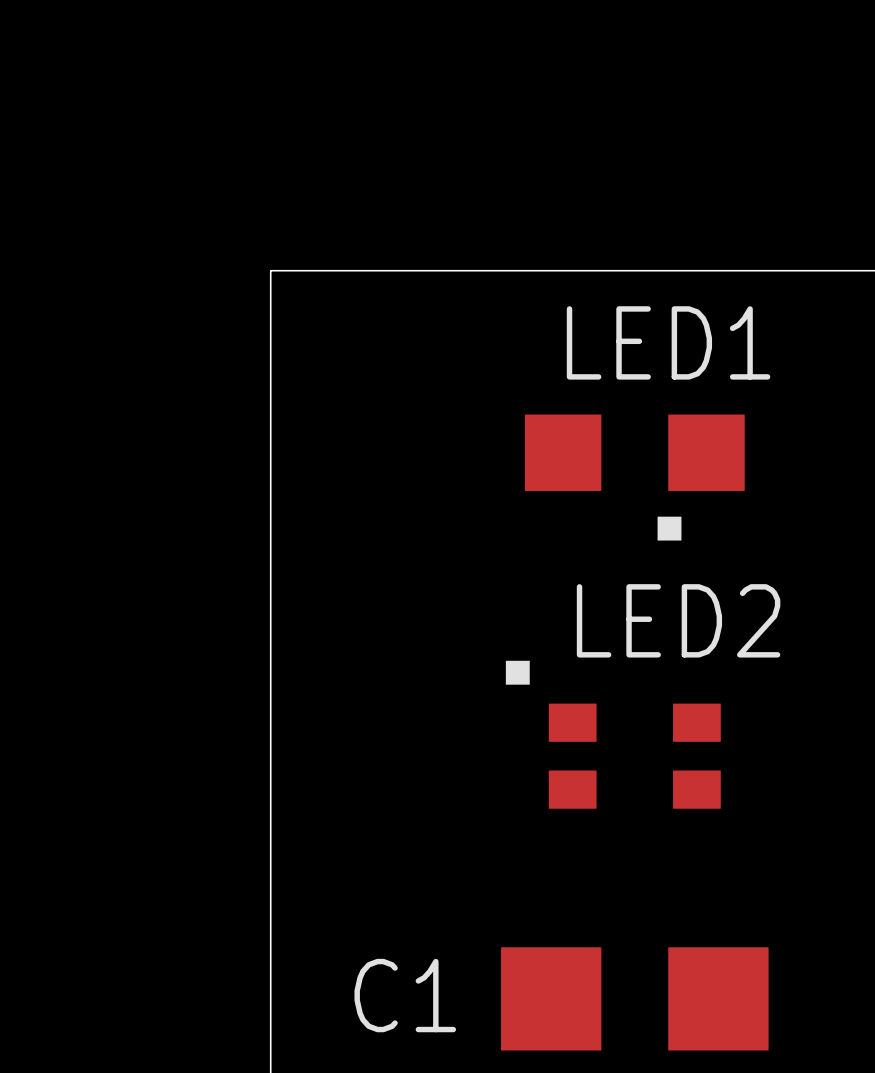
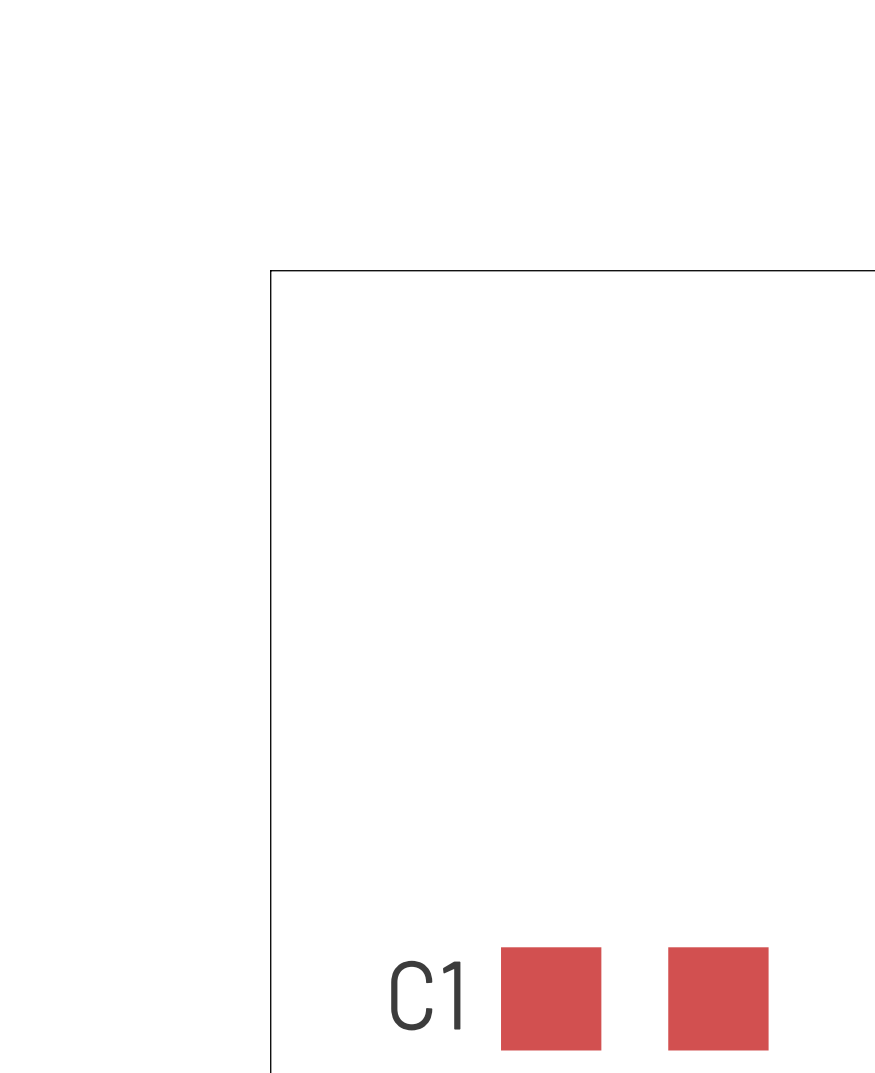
LED1: (634, 477) -> none
LED2: (613, 734) -> none

